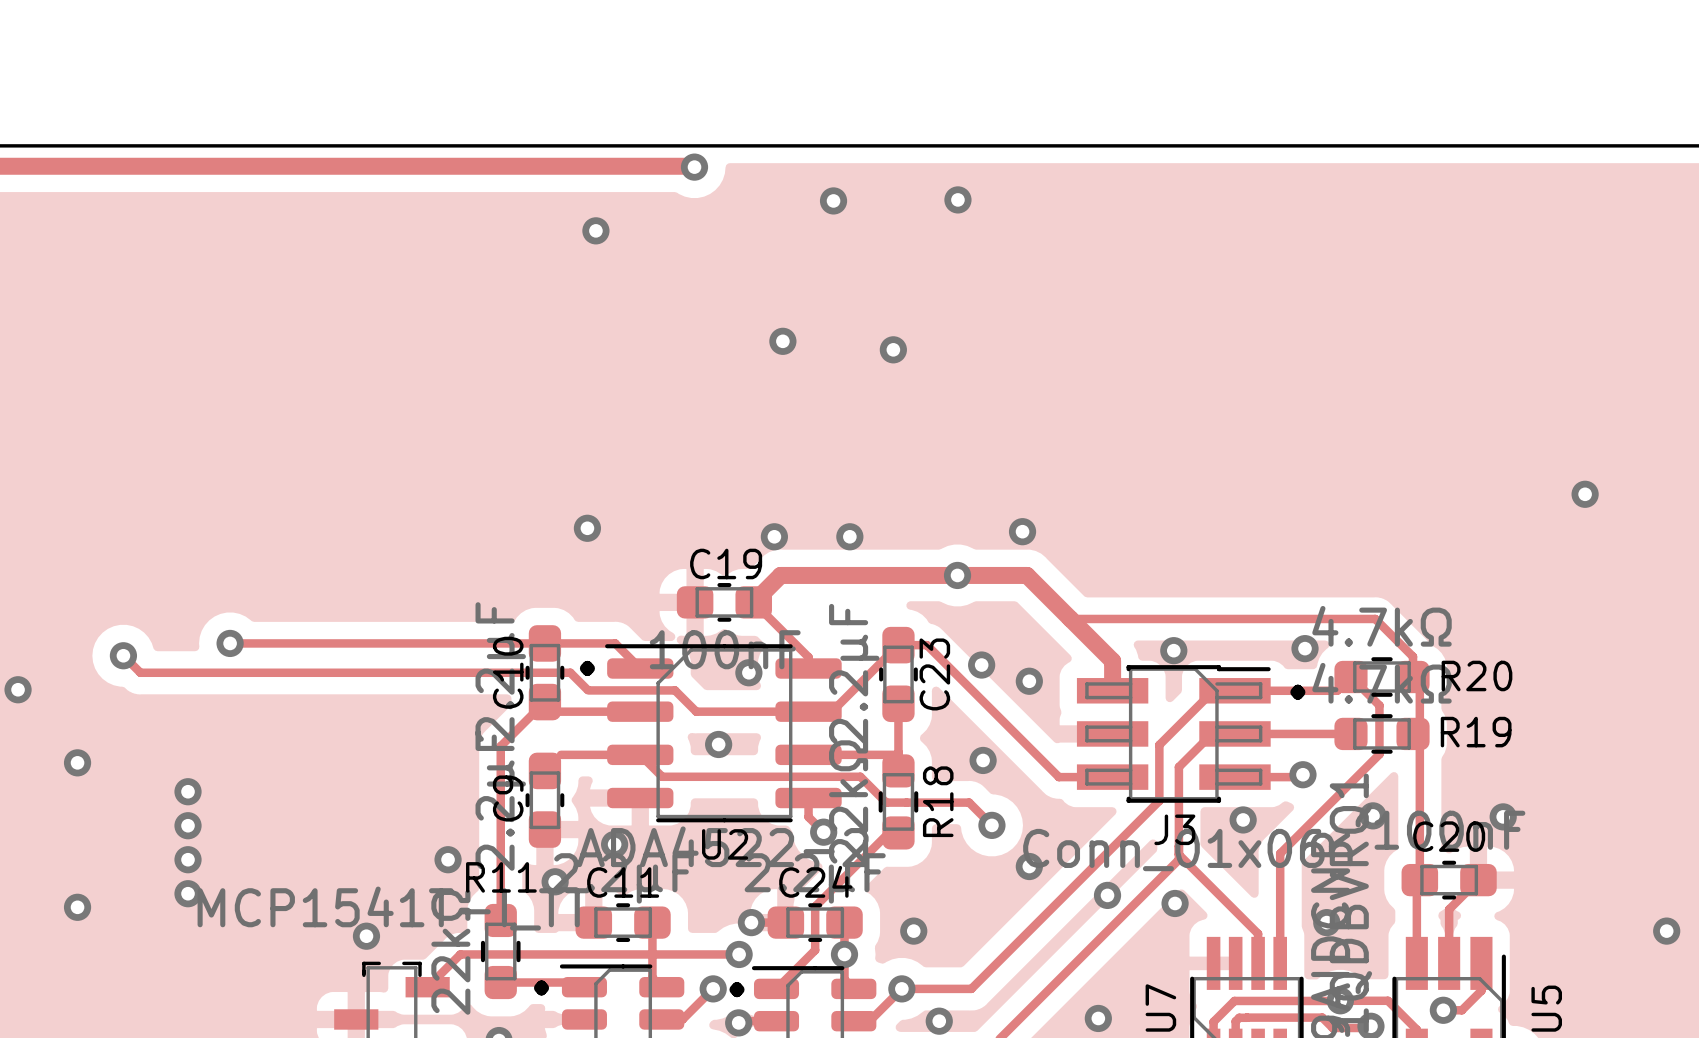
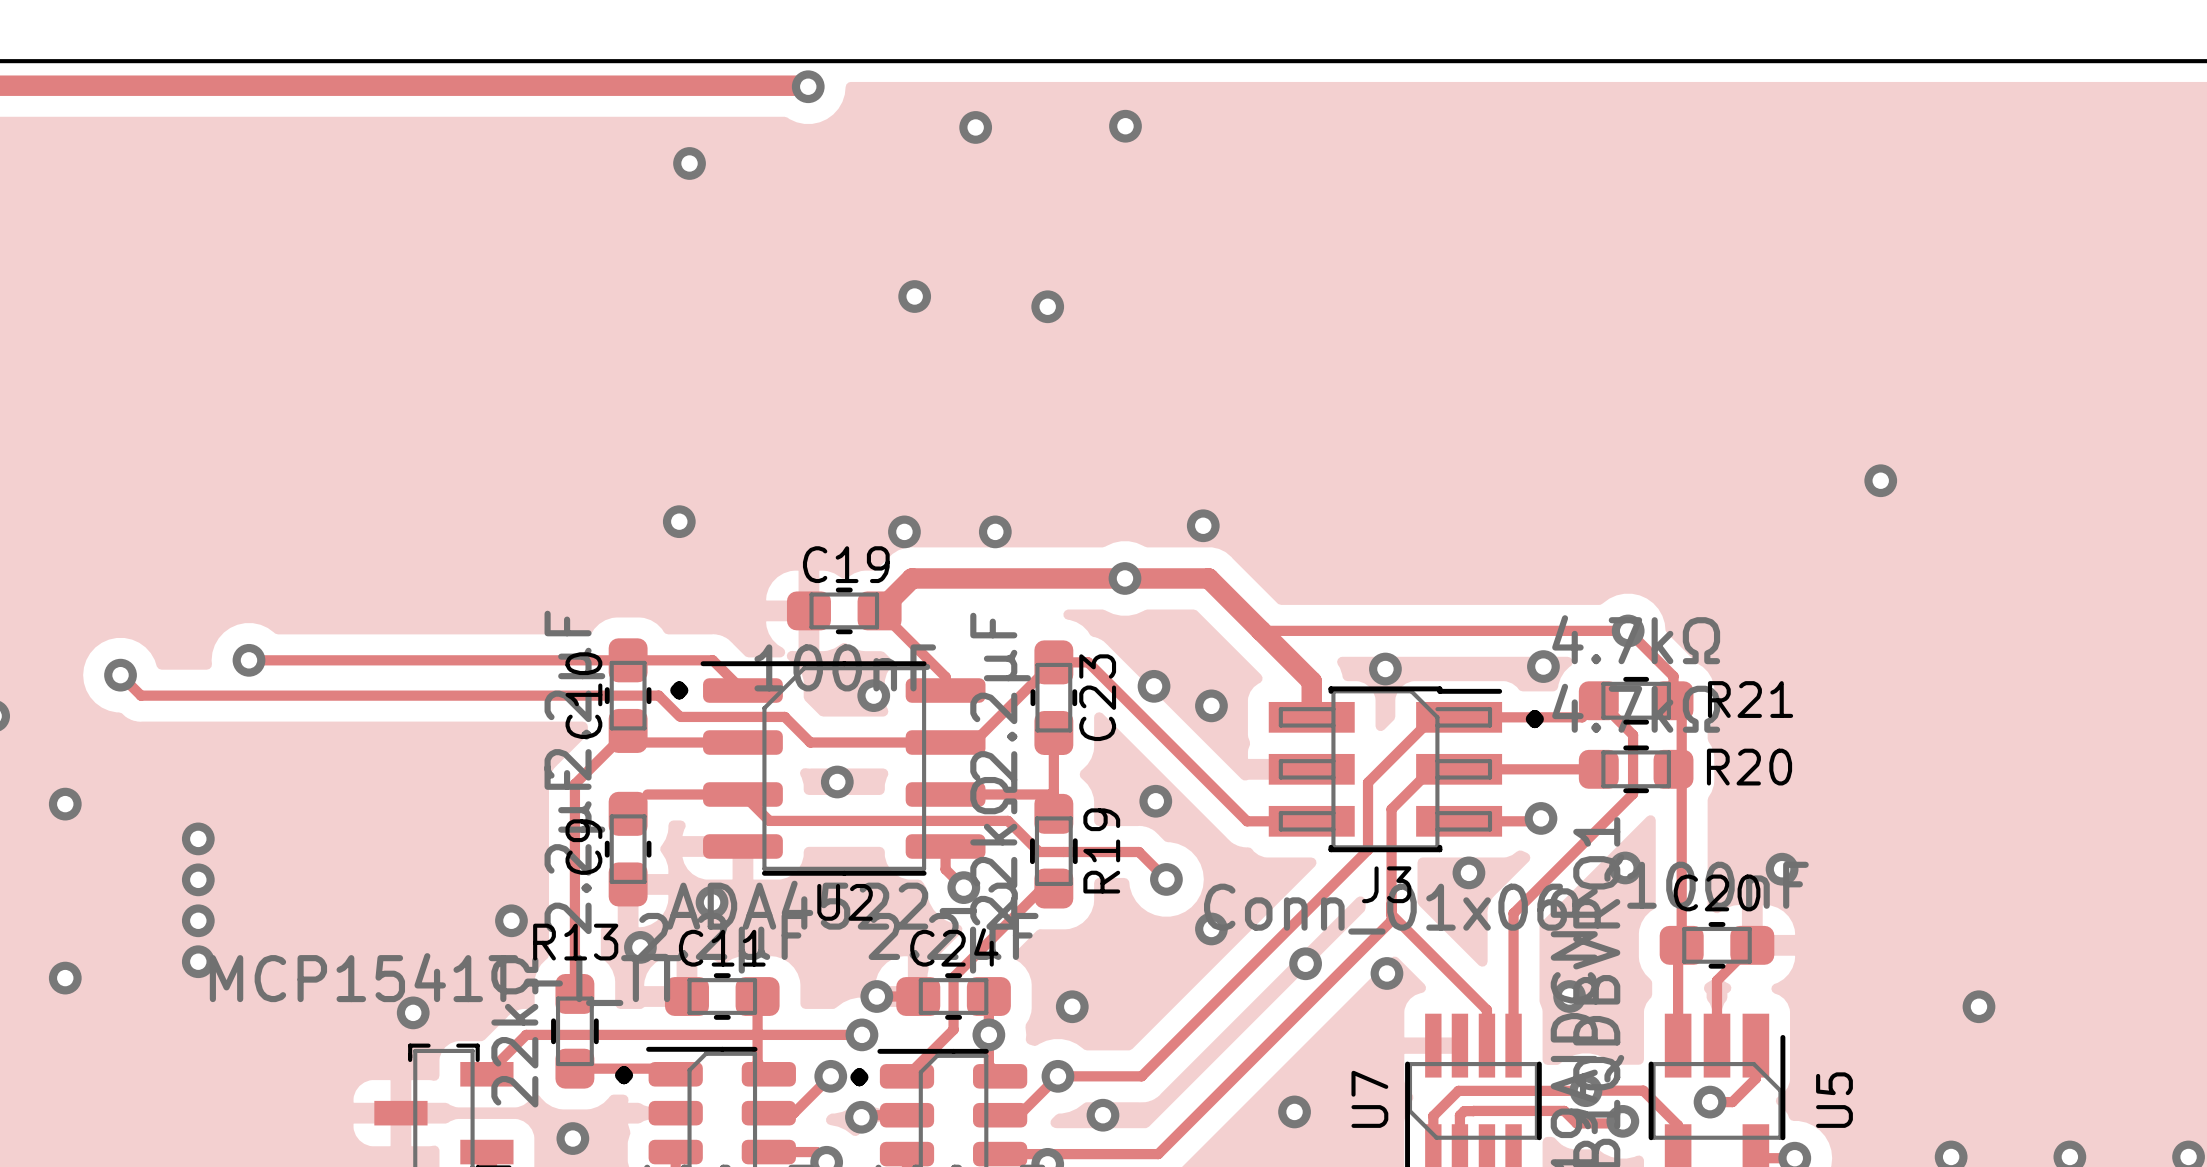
via: none -> (1628, 630)
R20 name: R20 (1476, 675) -> R21 (1750, 699)
R19 name: R19 (1476, 732) -> R20 (1749, 767)
R18 name: R18 (938, 801) -> R19 (1101, 850)
R11 name: R11 (501, 877) -> R13 (575, 942)

